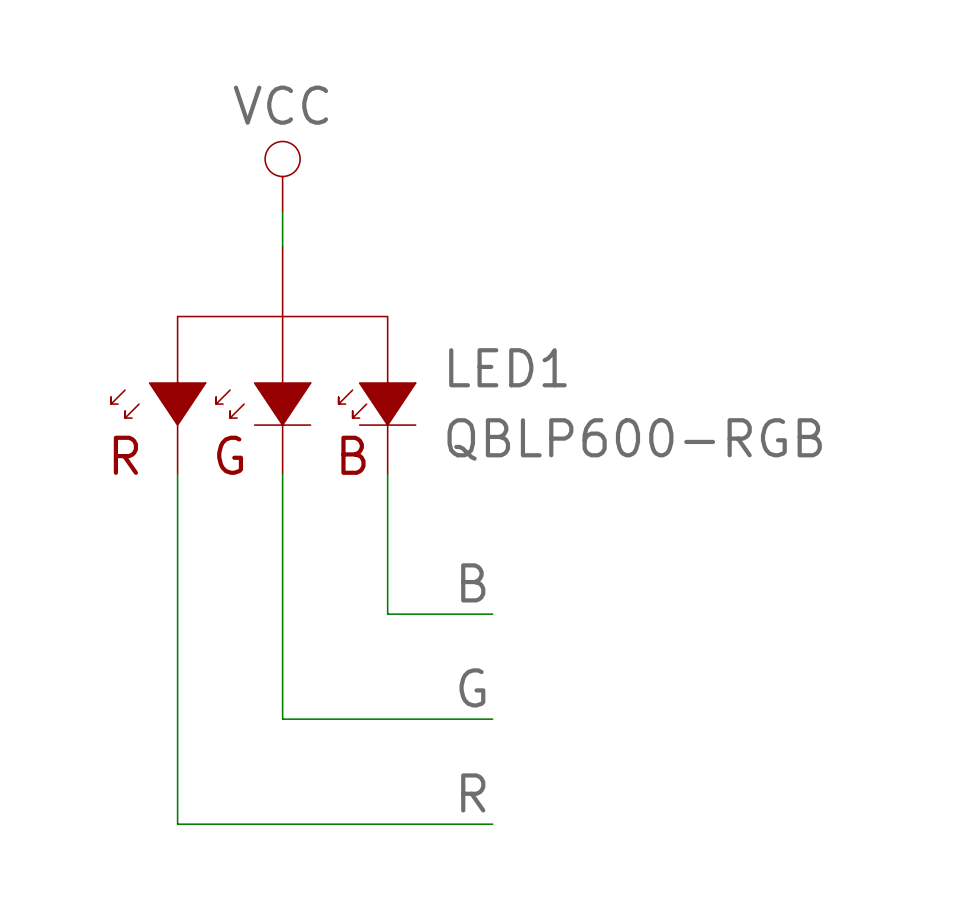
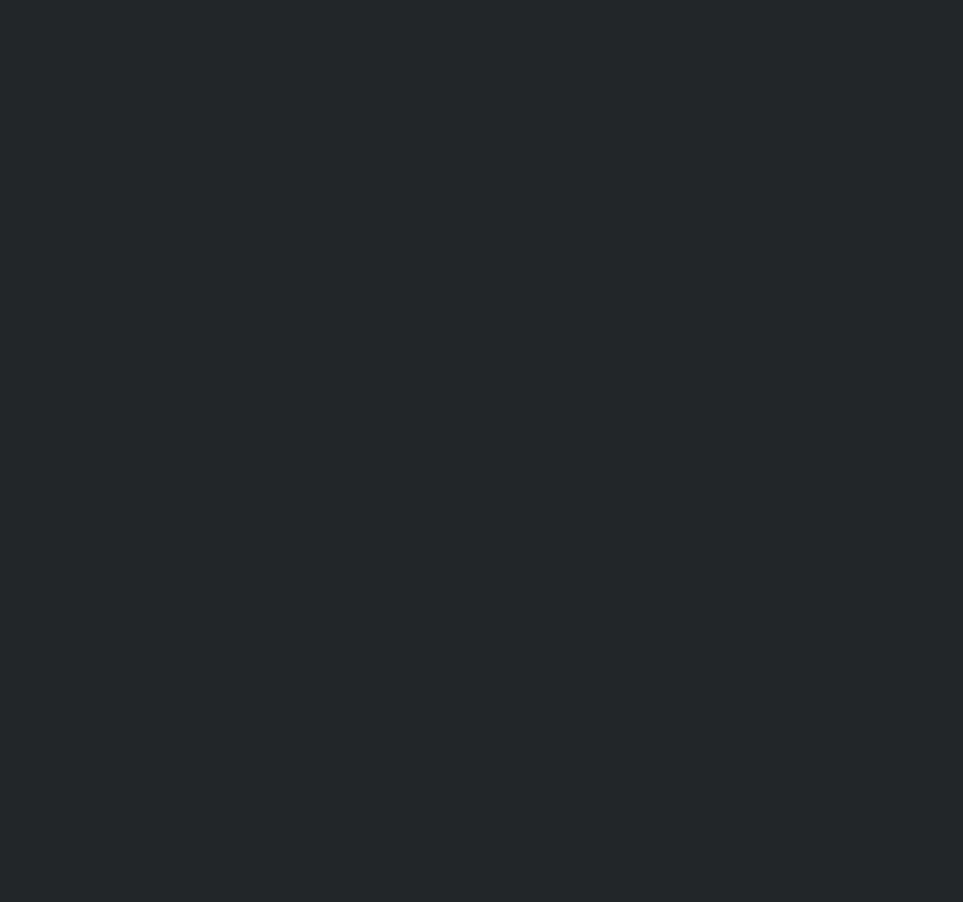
power symbol: VCC (282, 176) -> none
wire: (282, 211) (282, 246) -> none
LED1: QBLP600-RGB (263, 360) -> none
wire: (177, 474) (177, 824) (492, 824) -> none
wire: (282, 474) (282, 719) (492, 719) -> none
wire: (387, 474) (387, 614) (492, 614) -> none
label: B (473, 582) -> none
label: G (472, 687) -> none
label: R (473, 792) -> none

